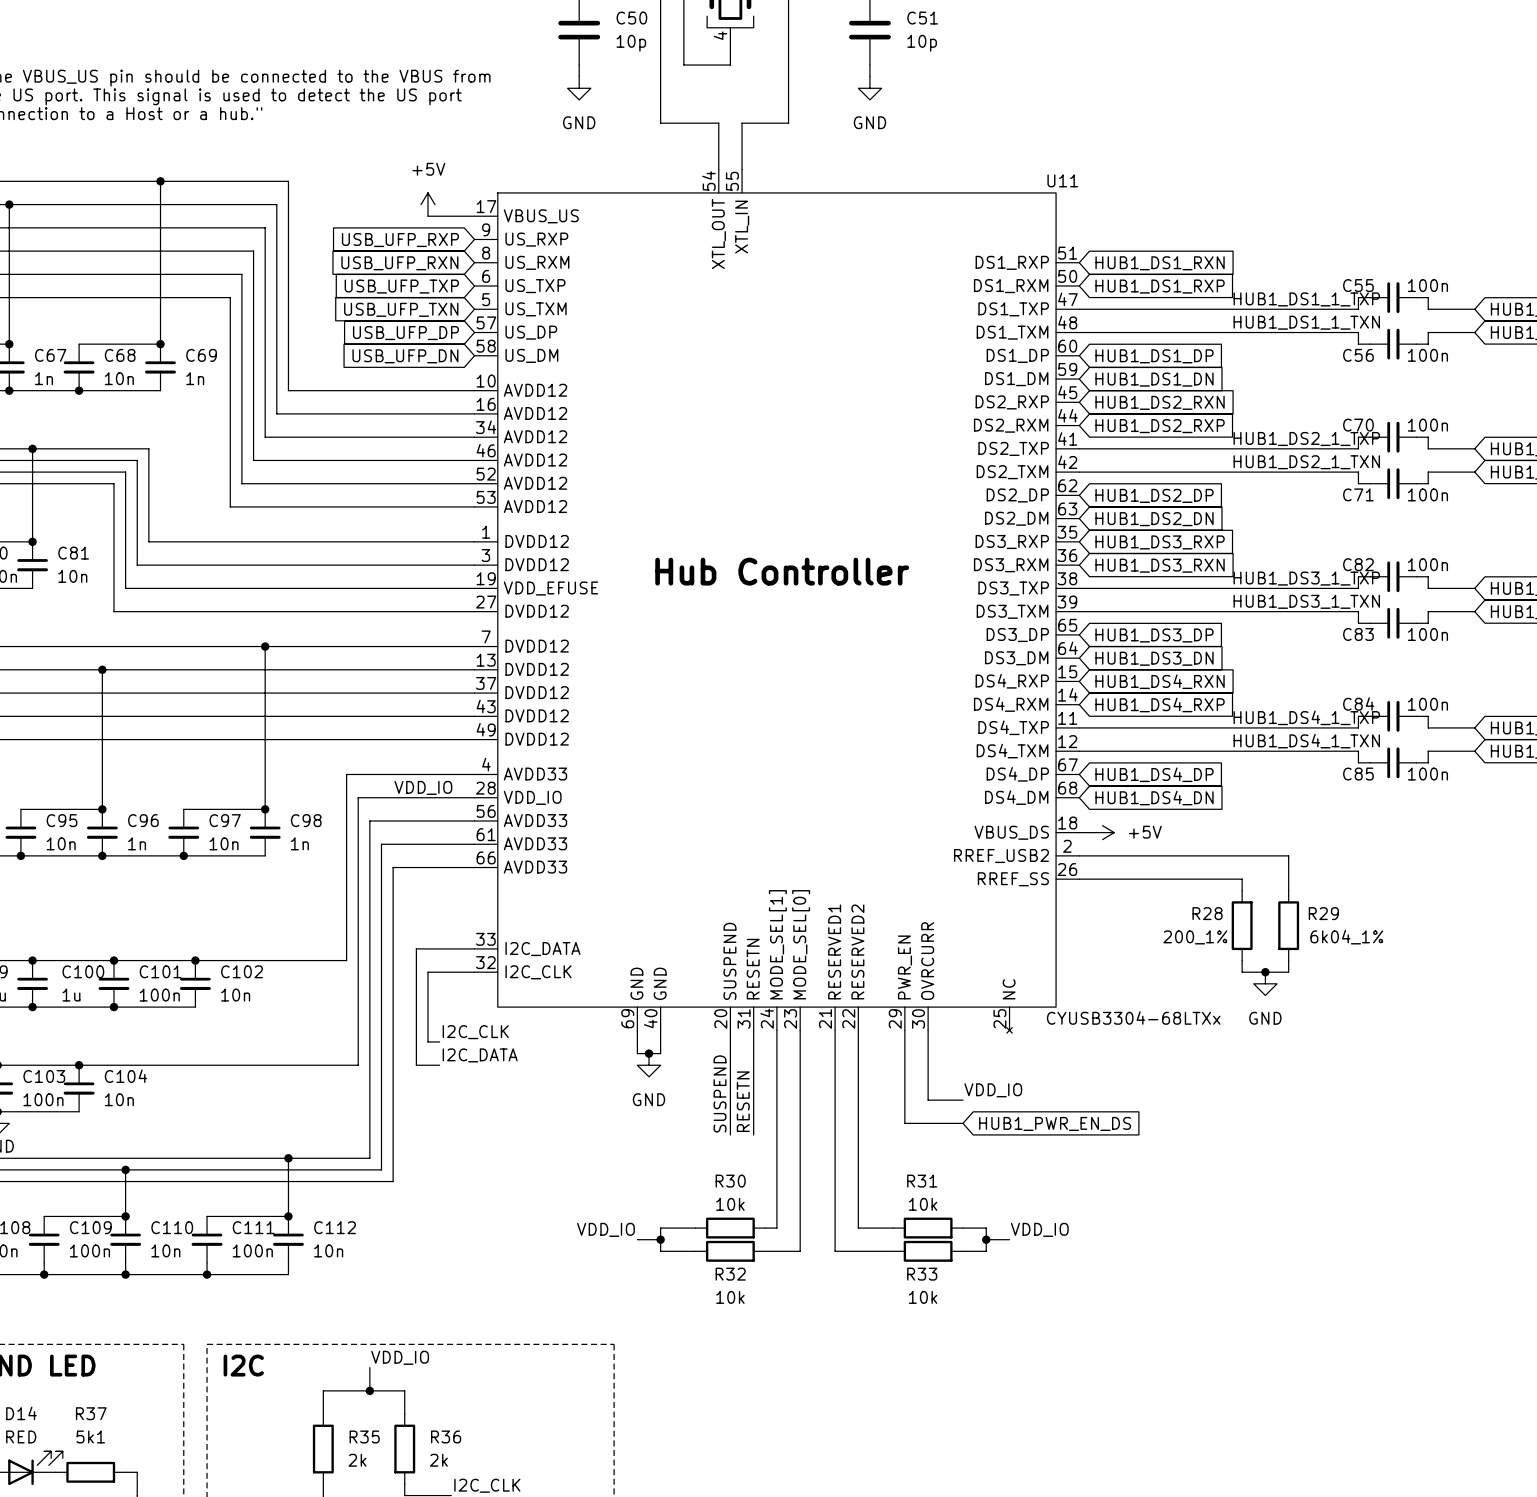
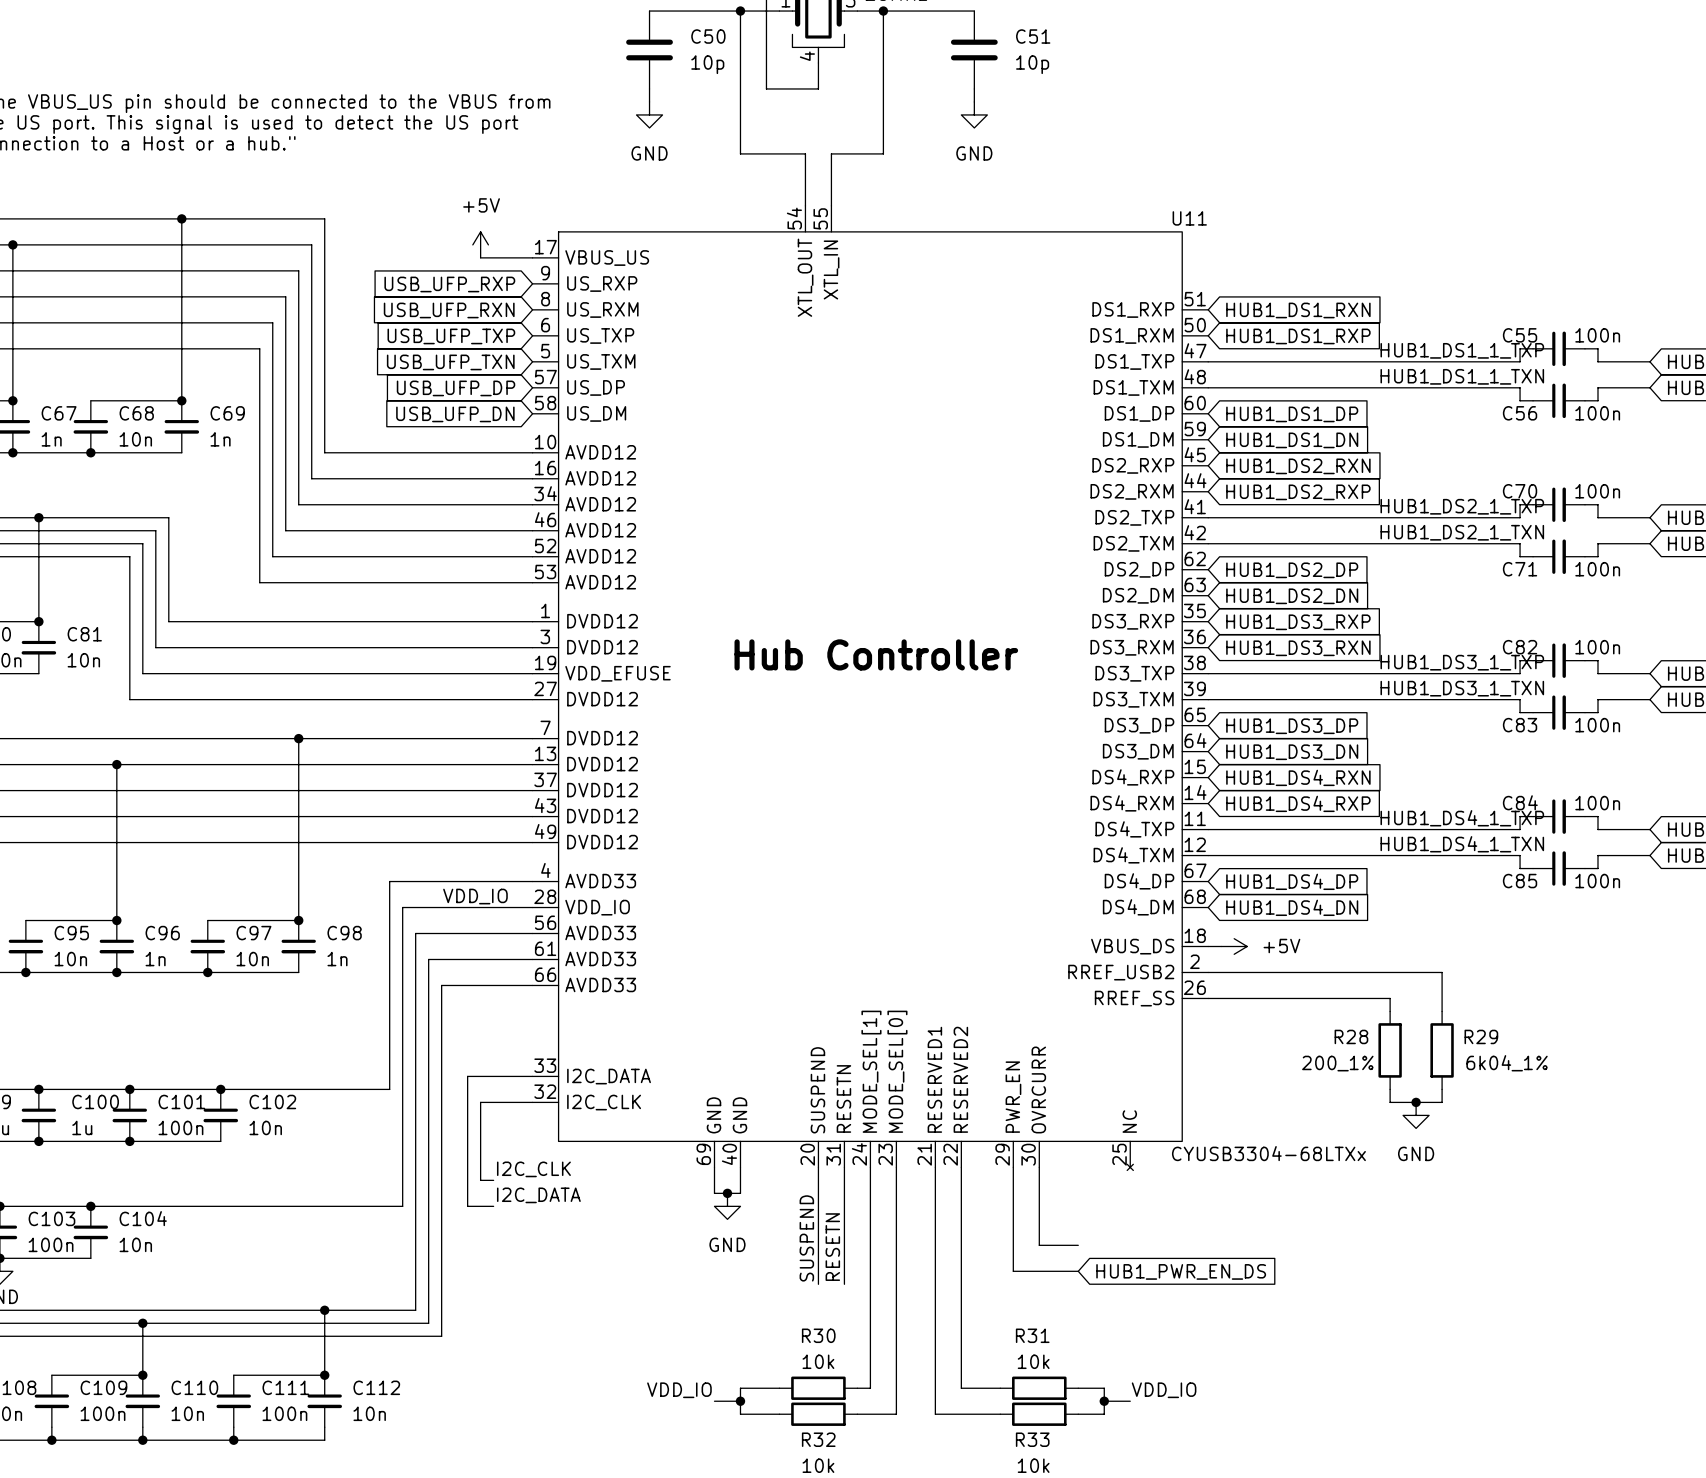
label: VDD_IO (993, 1090) -> none

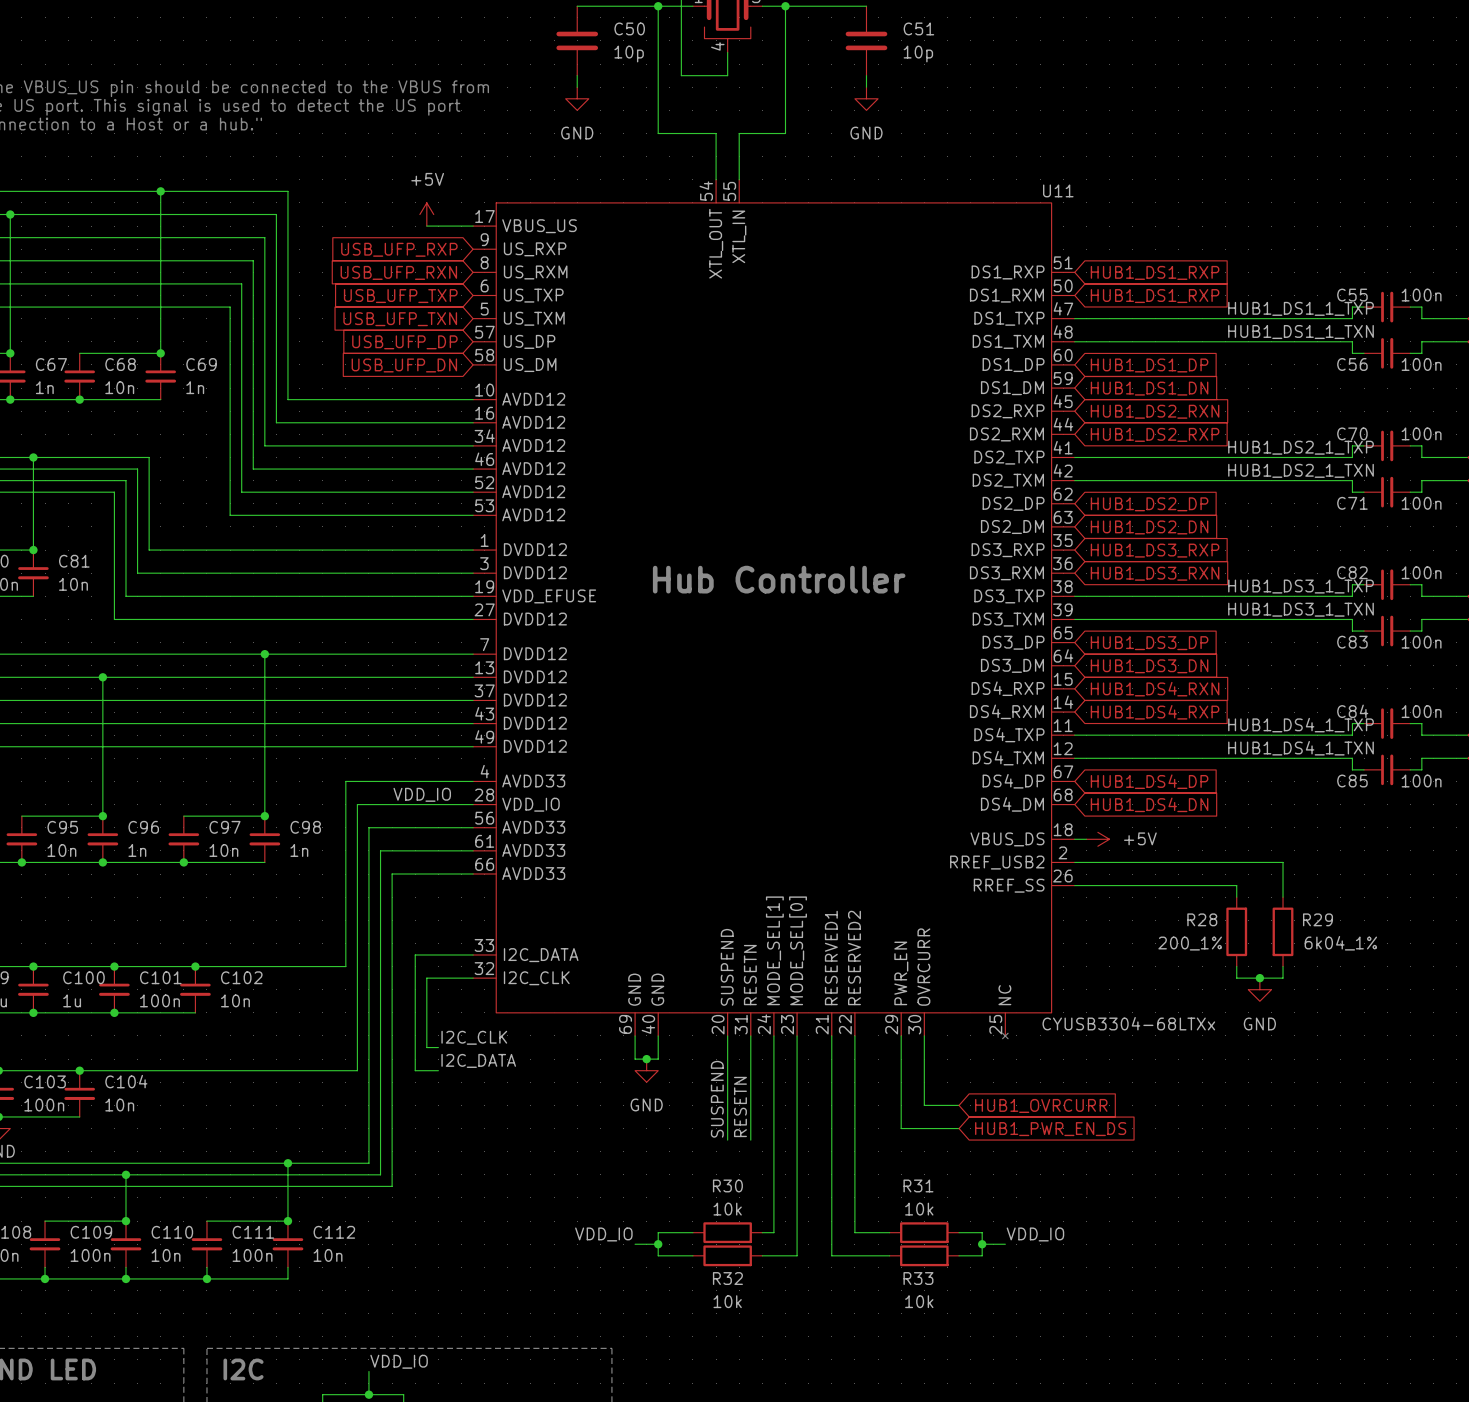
global label: HUB1_DS1_RXN (1298, 310) -> HUB1_DS1_RXP (1155, 272)
global label: none -> HUB1_OVRCURR (1041, 1105)

